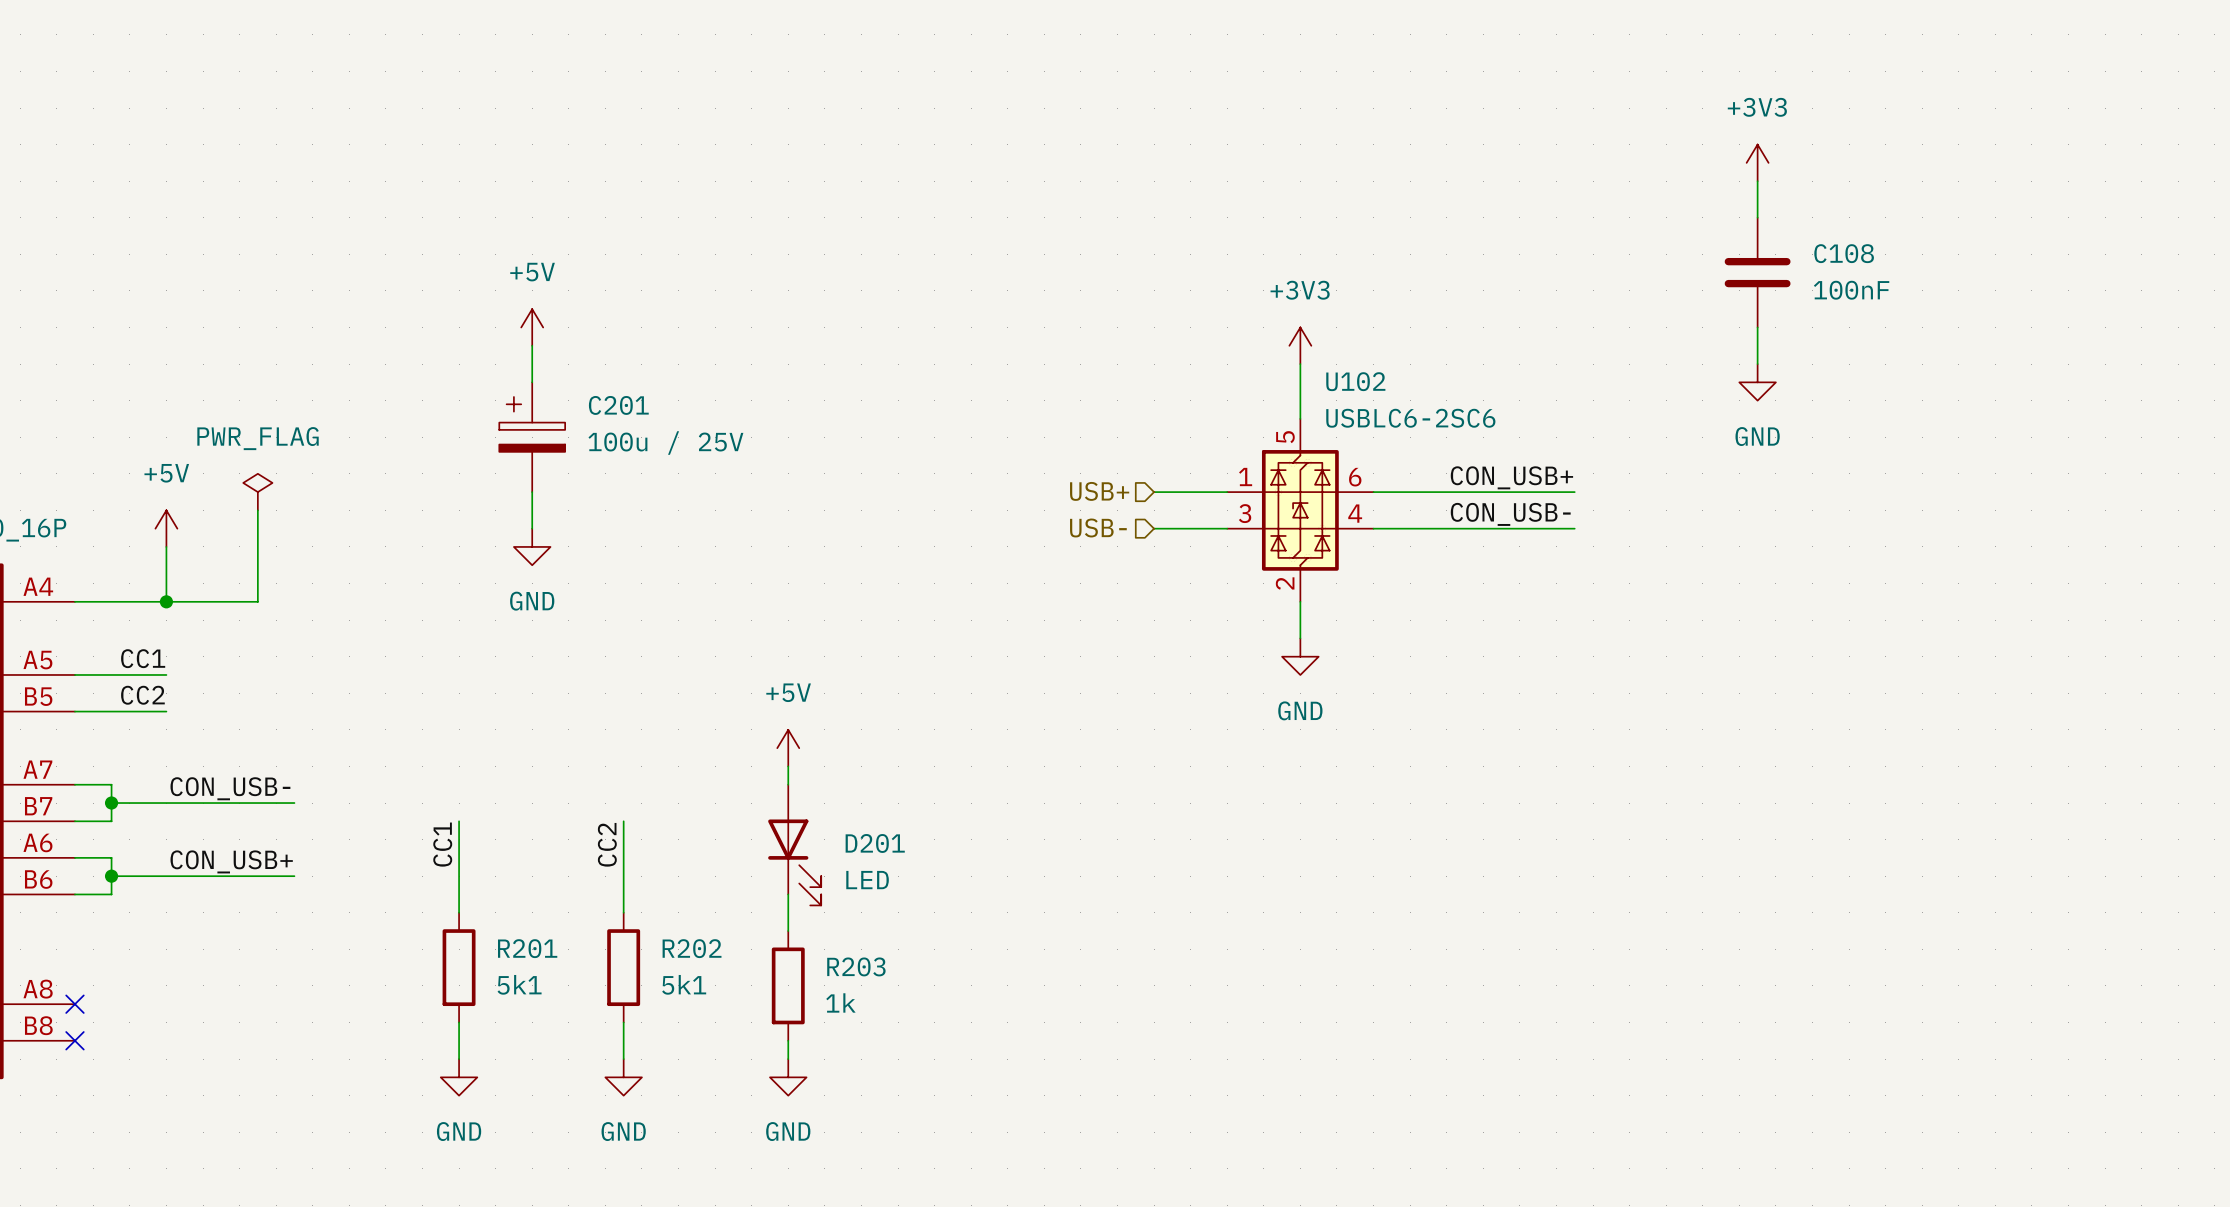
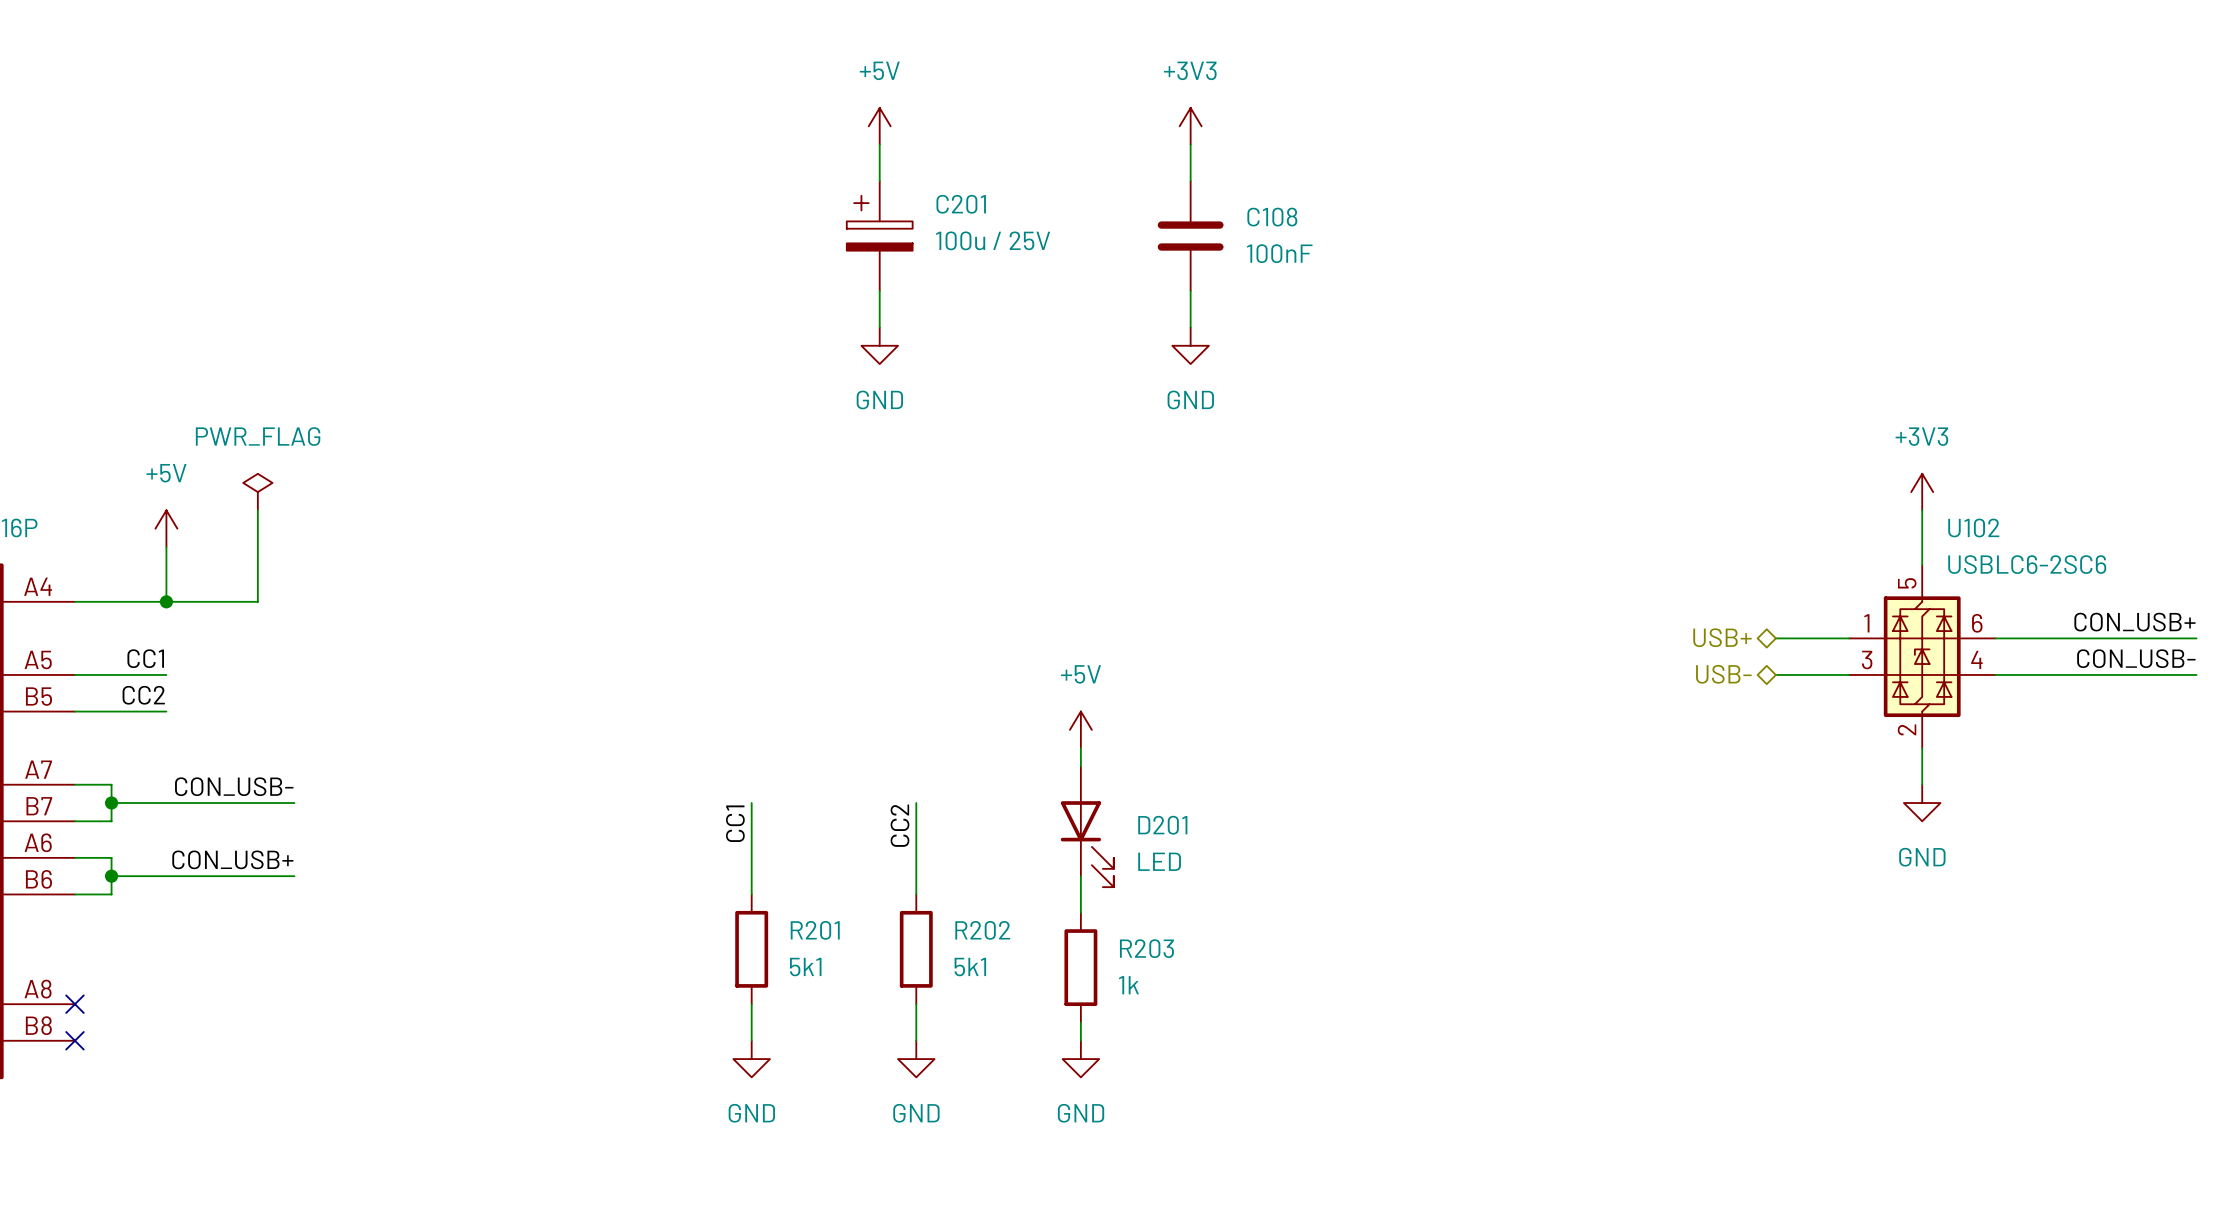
power symbol: none -> +5V (879, 126)
wire: none -> (879, 144) (879, 181)
wire: none -> (1190, 144) (1190, 181)
power symbol: +3V3 (1757, 162) -> none
wire: (1757, 181) (1757, 217) -> none
C108 position: (1757, 272) -> (1190, 236)
power symbol: +5V (532, 327) -> none
wire: (1757, 327) (1757, 364) -> none
wire: (532, 345) (532, 382) -> (879, 290) (879, 327)
power symbol: none -> GND (879, 345)
power symbol: none -> GND (1190, 345)
power symbol position: +3V3 (1300, 345) -> +3V3 (1190, 126)
wire: (1300, 364) (1300, 418) -> none
power symbol: GND (1757, 382) -> none
C201 position: (532, 437) -> (879, 236)
label: CON_USB+ (1511, 477) -> none
hierarchical label: USB+ (1099, 491) -> none
wire: (532, 492) (532, 528) -> none
wire: (1154, 492) (1227, 492) -> none
wire: (1373, 492) (1574, 492) -> none
power symbol: none -> +3V3 (1922, 492)
U102 position: (1300, 510) -> (1922, 656)
wire: none -> (1922, 510) (1922, 565)
label: CON_USB- (1510, 514) -> none
hierarchical label: USB- (1098, 527) -> none
wire: (1154, 528) (1227, 528) -> none
wire: (1373, 528) (1574, 528) -> none
power symbol: GND (532, 546) -> none
wire: (1300, 601) (1300, 638) -> (1190, 290) (1190, 327)
label: none -> CON_USB+ (2134, 622)
hierarchical label: none -> USB+ (1722, 637)
wire: none -> (1775, 638) (1849, 638)
wire: none -> (1995, 638) (2196, 638)
power symbol: GND (1300, 656) -> none
label: none -> CON_USB- (2136, 658)
hierarchical label: none -> USB- (1723, 674)
wire: none -> (1775, 674) (1849, 674)
wire: none -> (1995, 674) (2196, 674)
power symbol position: +5V (788, 748) -> +5V (1080, 729)
wire: none -> (1922, 748) (1922, 784)
wire: (788, 766) (788, 784) -> (1080, 748) (1080, 766)
power symbol: none -> GND (1922, 803)
wire: (459, 821) (459, 912) -> (751, 803) (751, 894)
wire: (623, 821) (623, 912) -> (916, 803) (916, 894)
label position: CC1 (442, 844) -> CC1 (735, 823)
label position: CC2 (607, 844) -> CC2 (899, 825)
D201 position: (794, 845) -> (1087, 826)
wire: (788, 894) (788, 931) -> (1080, 876) (1080, 912)
R201 position: (459, 967) -> (751, 949)
R202 position: (623, 967) -> (916, 949)
R203 position: (788, 985) -> (1080, 967)
wire: (459, 1022) (459, 1059) -> (751, 1004) (751, 1040)
wire: (623, 1022) (623, 1059) -> (916, 1004) (916, 1040)
wire: (788, 1040) (788, 1059) -> (1080, 1022) (1080, 1040)
power symbol: none -> GND (916, 1059)
power symbol: none -> GND (1080, 1059)
power symbol: GND (459, 1077) -> none
power symbol: GND (623, 1077) -> none
power symbol position: GND (788, 1077) -> GND (751, 1059)

